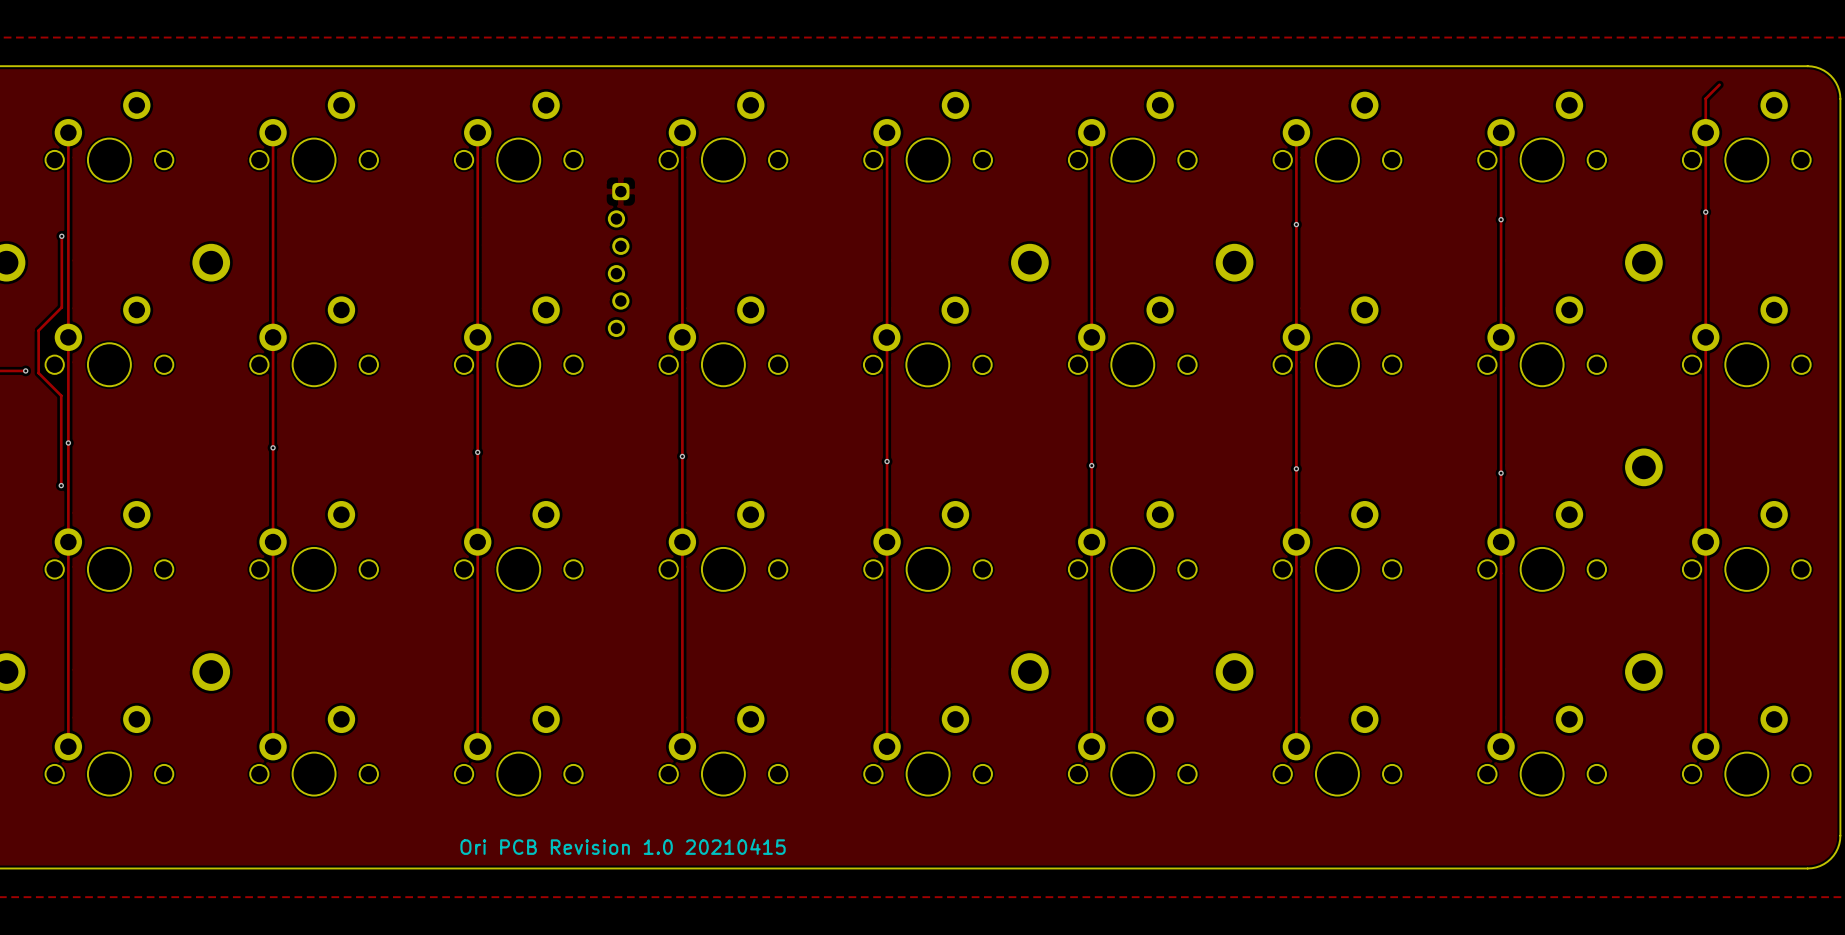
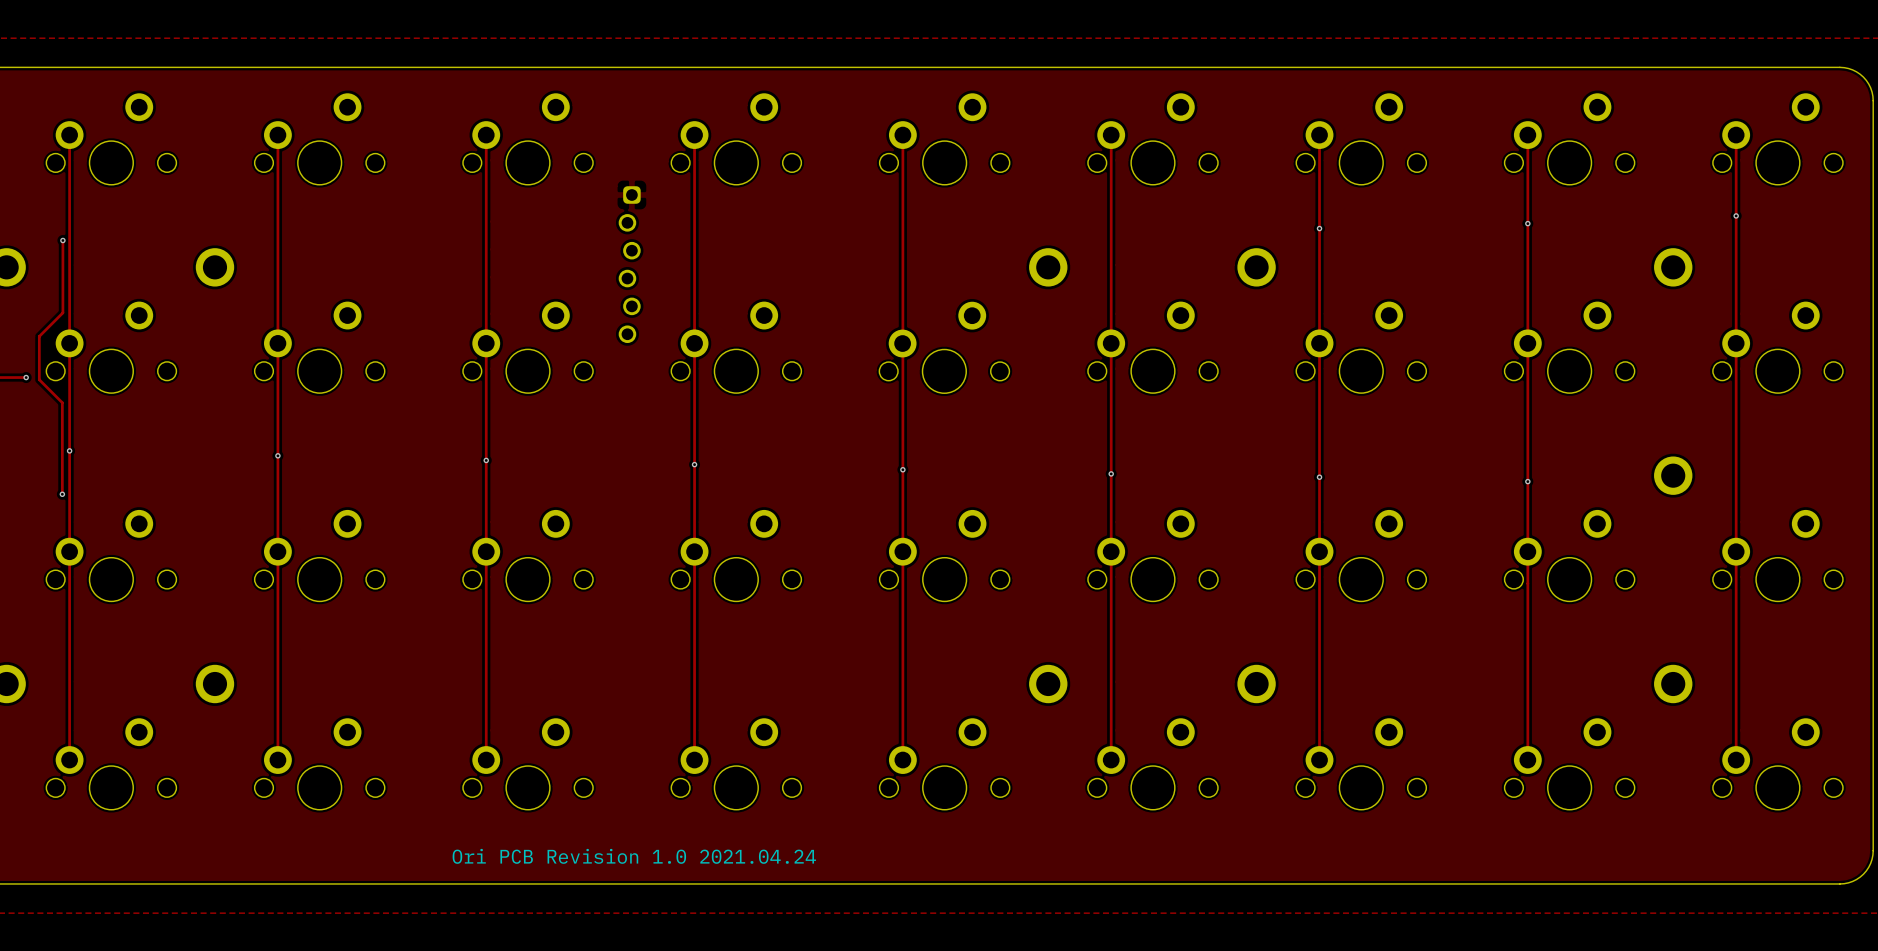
track: (1719, 84) (1705, 98) (1705, 132) -> none
text: Ori PCB Revision 1.0 20210415 (623, 846) -> Ori PCB Revision 1.0 2021.04.24 (634, 856)

